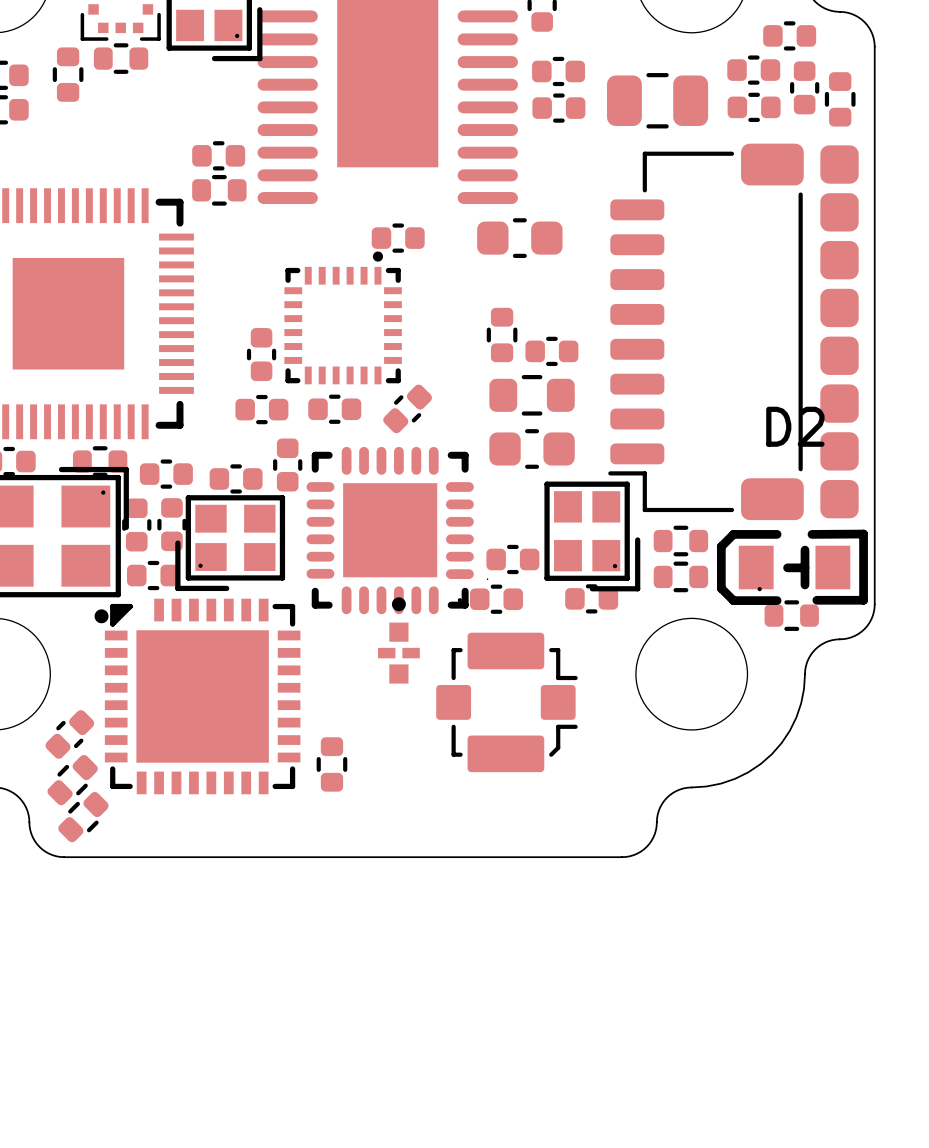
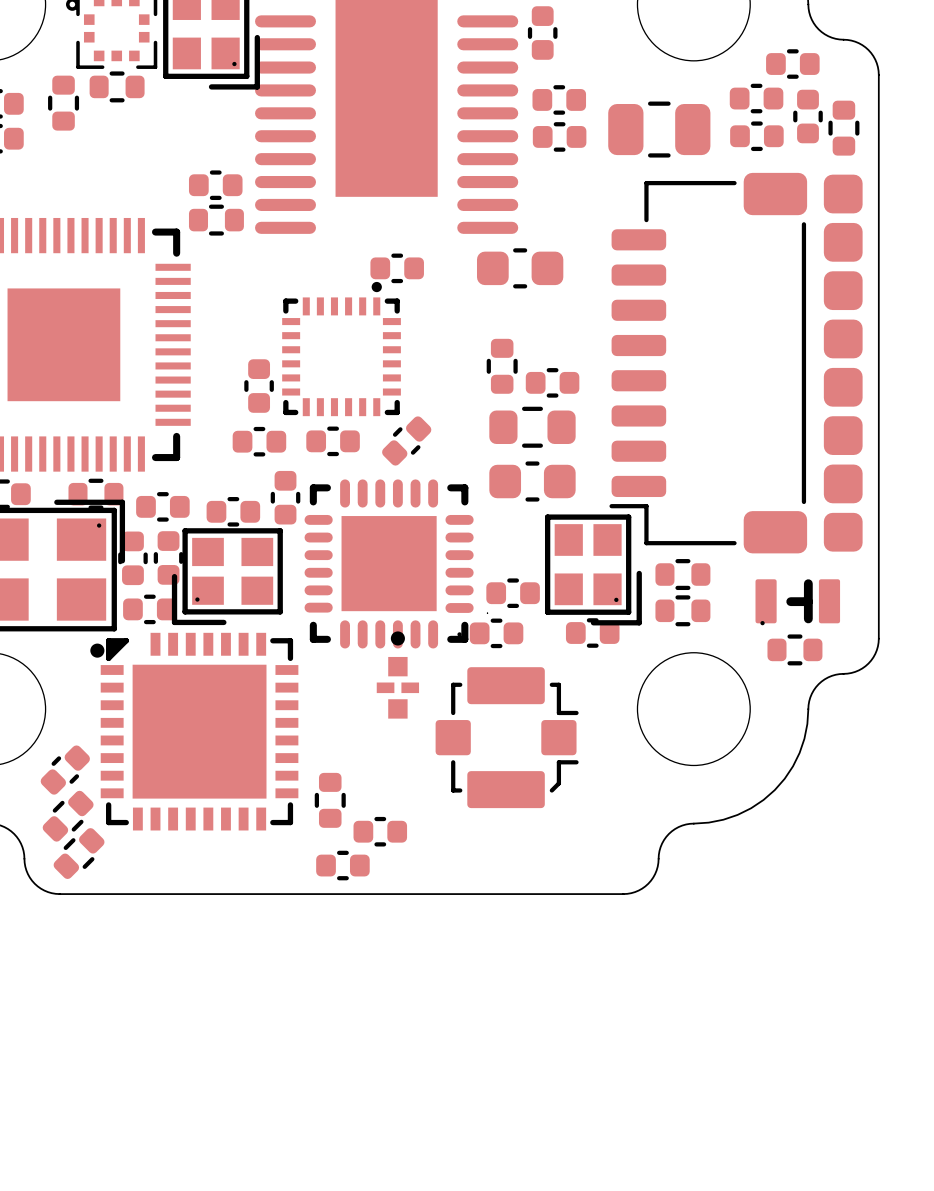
D2: (792, 567) -> none
part: none -> (797, 602)
part: none -> (380, 831)
part: none -> (342, 865)

